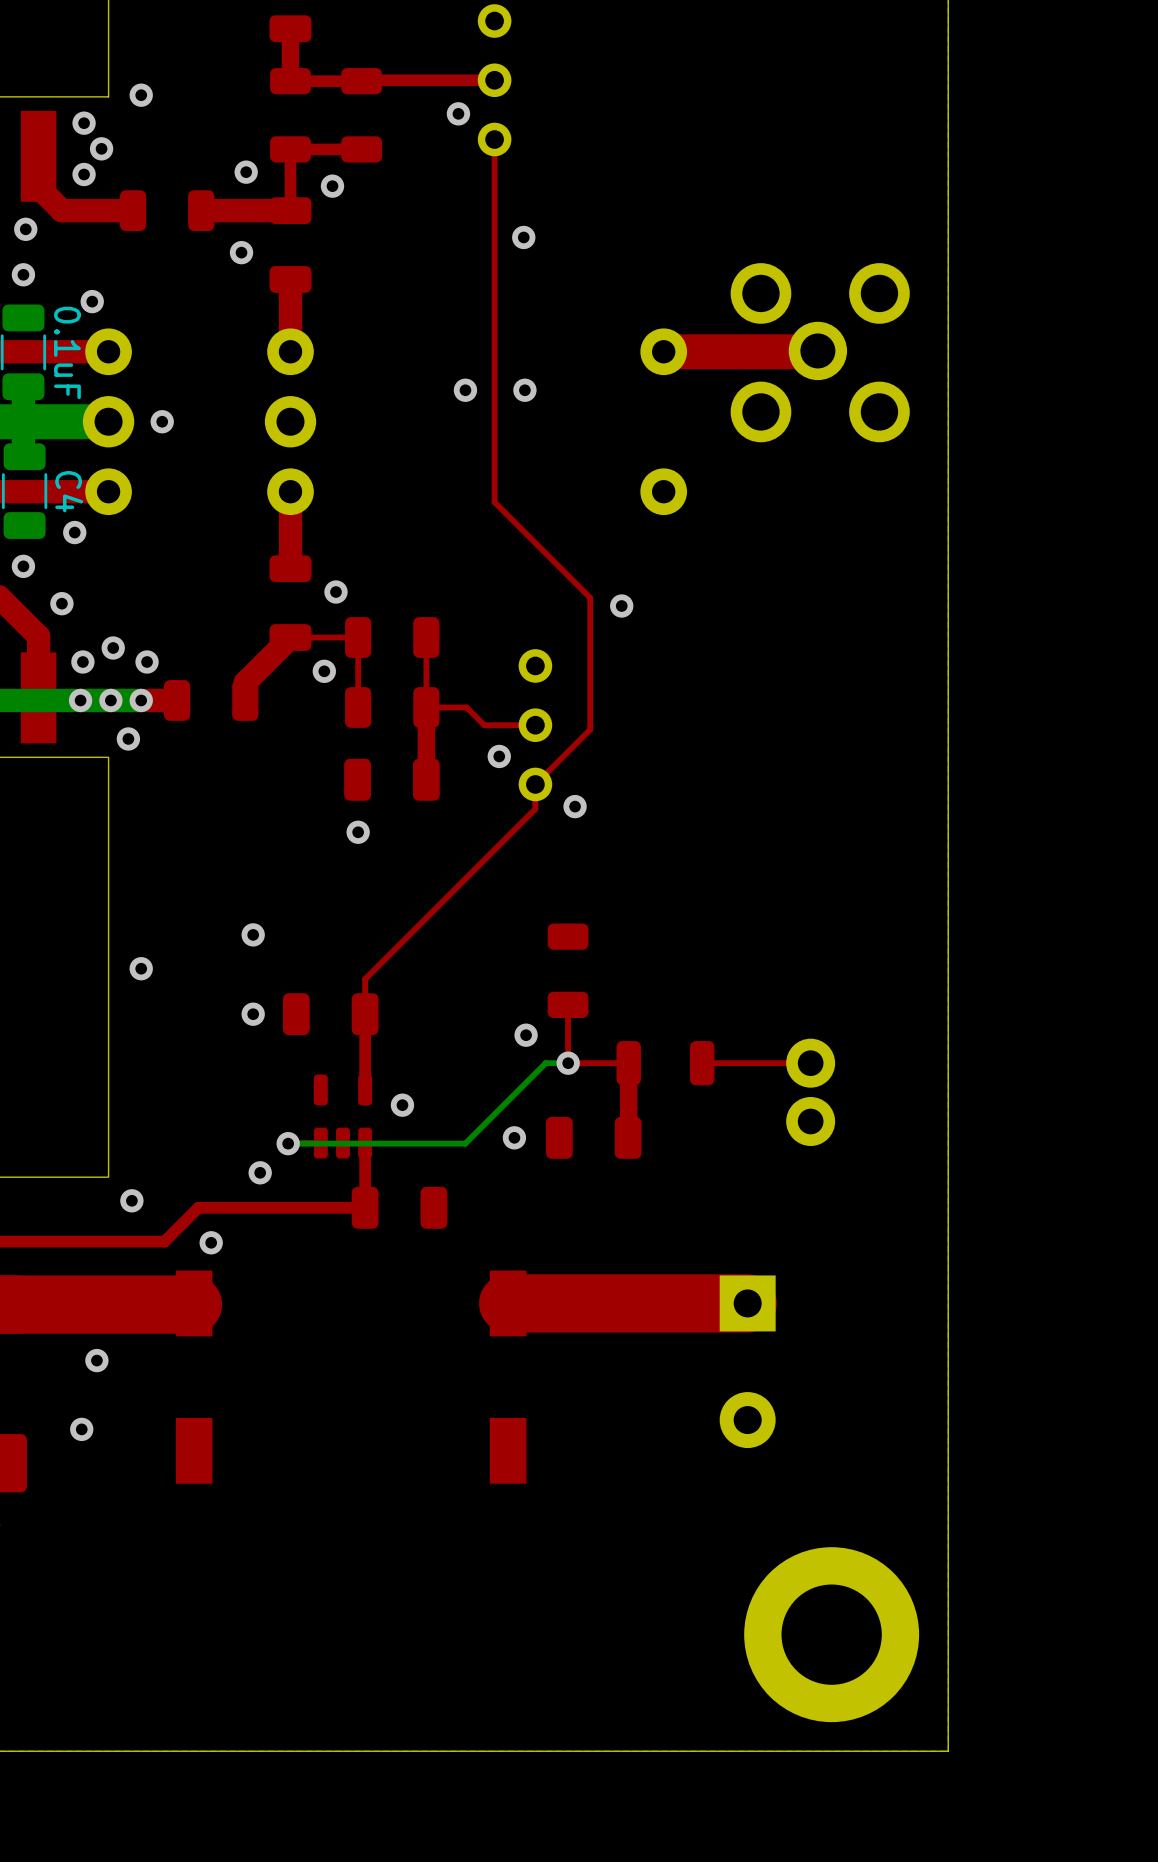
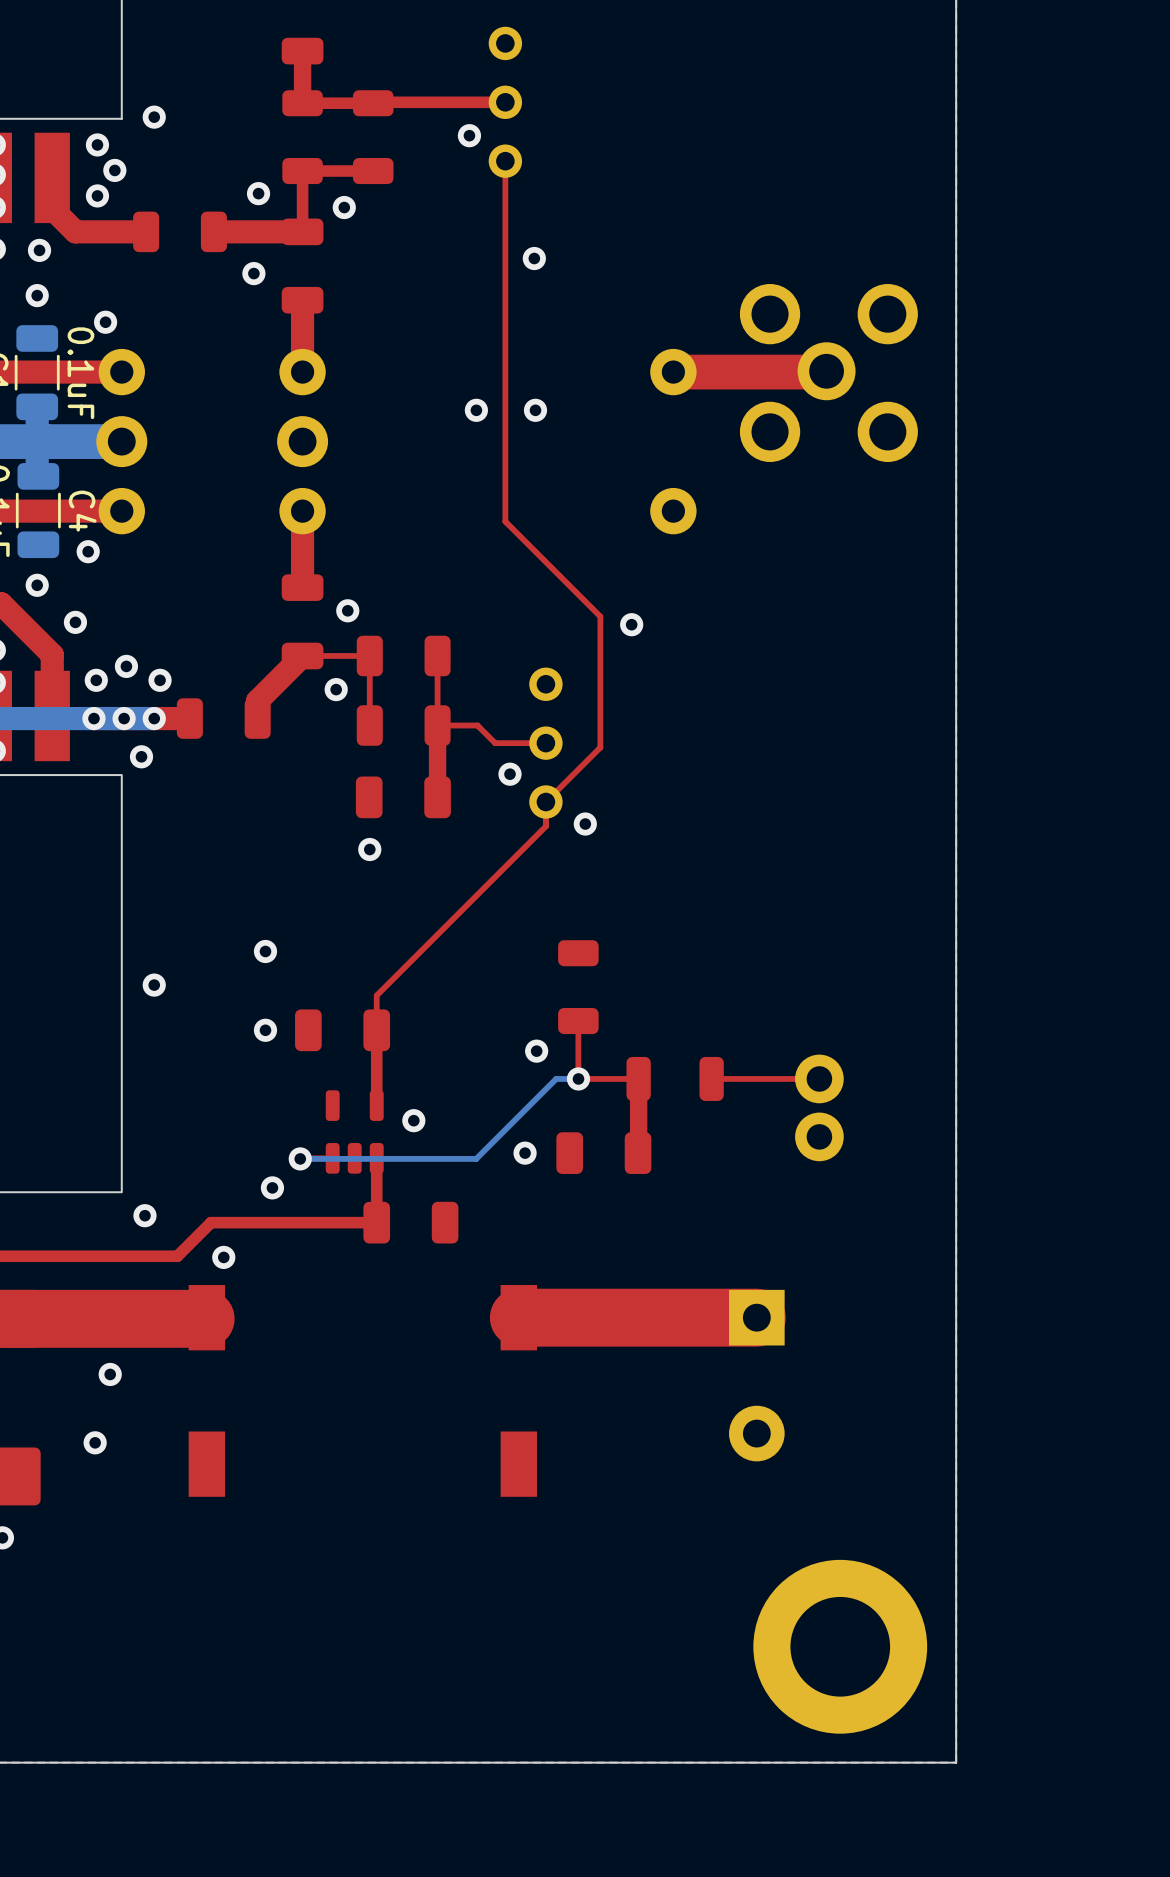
via: (162, 421) -> none

